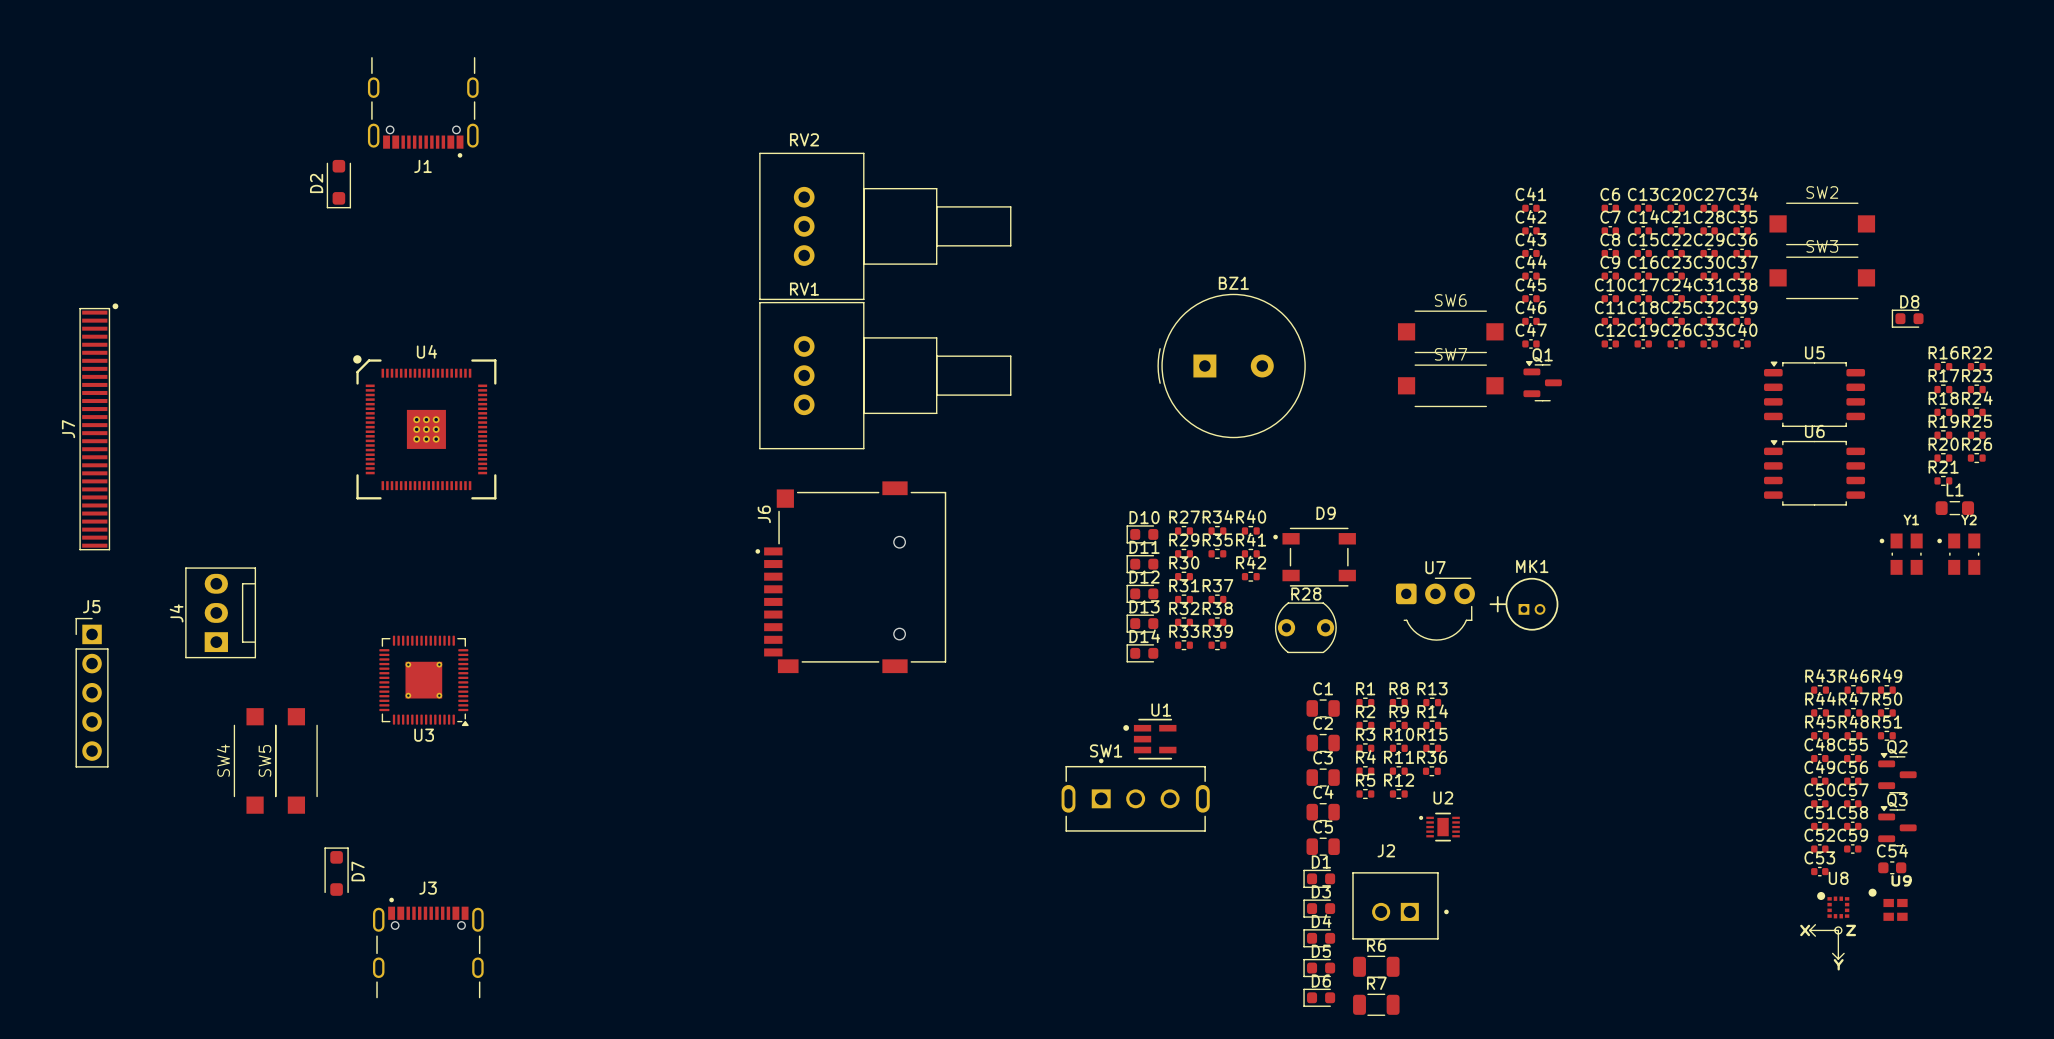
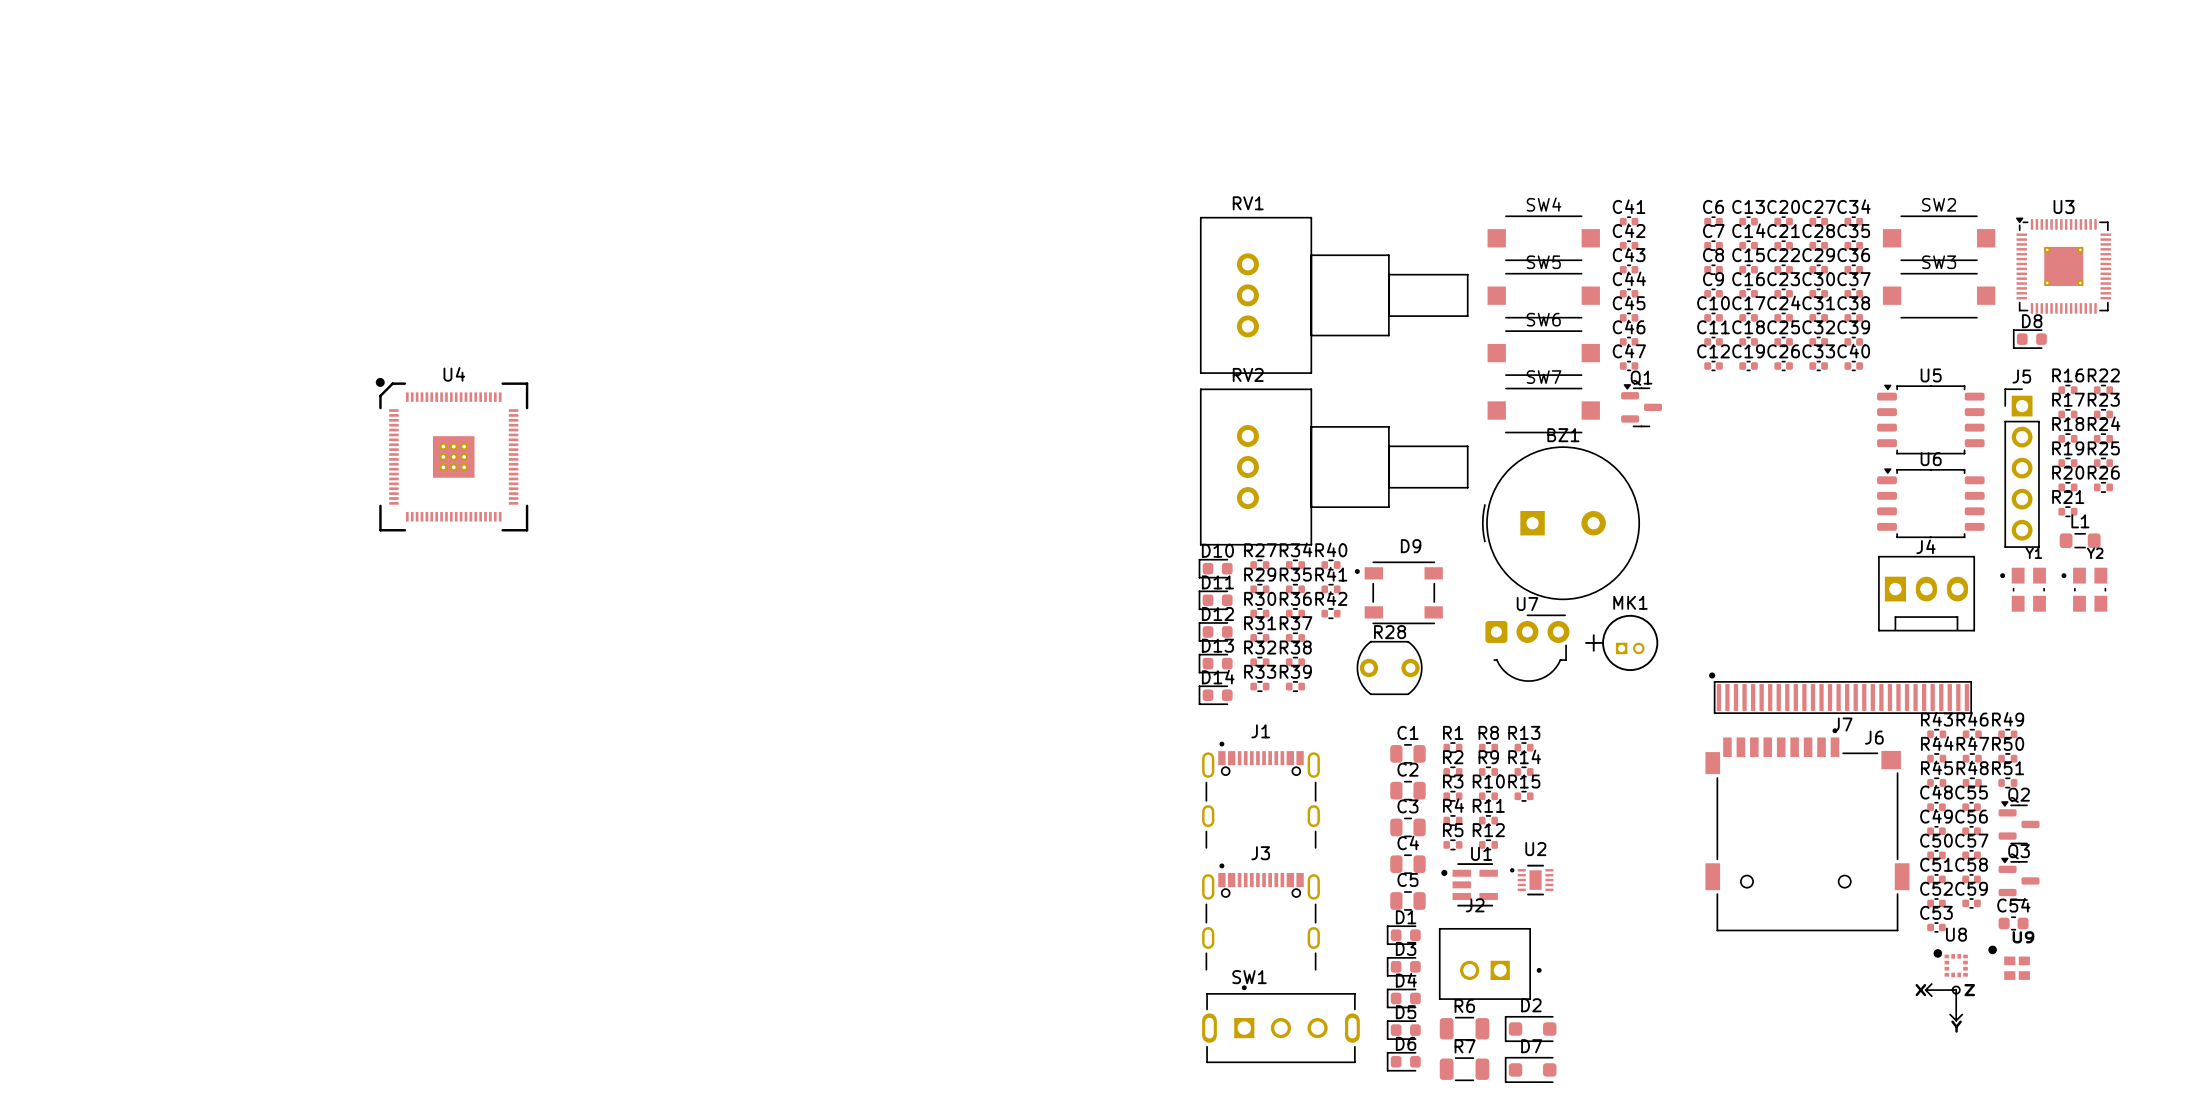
J1 rotation: 0° (423, 107) -> 180° (1260, 795)
J1 position: (423, 107) -> (1260, 795)
D2 rotation: 0° (338, 184) -> 90° clockwise (1530, 1029)
D2 position: (338, 184) -> (1530, 1029)
RV2 position: (885, 226) -> (1334, 467)
BZ1 position: (1231, 365) -> (1561, 523)
RV1 position: (885, 375) -> (1334, 295)
J7 rotation: 0° (98, 426) -> 90° counterclockwise (1840, 693)
J7 position: (98, 426) -> (1840, 693)
J6 rotation: 0° (850, 577) -> 90° clockwise (1807, 829)
J6 position: (850, 577) -> (1807, 829)
J4 rotation: 0° (220, 612) -> 90° clockwise (1926, 593)
J4 position: (220, 612) -> (1926, 593)
U3 rotation: 0° (424, 680) -> 180° (2063, 265)
U3 position: (424, 680) -> (2063, 265)
J5 position: (92, 692) -> (2022, 468)
U1 position: (1149, 739) -> (1469, 884)
SW4 rotation: 0° (255, 760) -> 90° clockwise (1543, 238)
SW4 position: (255, 760) -> (1543, 238)
SW5 rotation: 0° (296, 760) -> 90° clockwise (1543, 295)
SW5 position: (296, 760) -> (1543, 295)
R36 position: (1431, 771) -> (1295, 613)
SW1 position: (1135, 795) -> (1280, 1024)
D7 rotation: 0° (336, 871) -> 90° counterclockwise (1530, 1069)
D7 position: (336, 871) -> (1530, 1069)
J3 position: (428, 948) -> (1260, 917)

